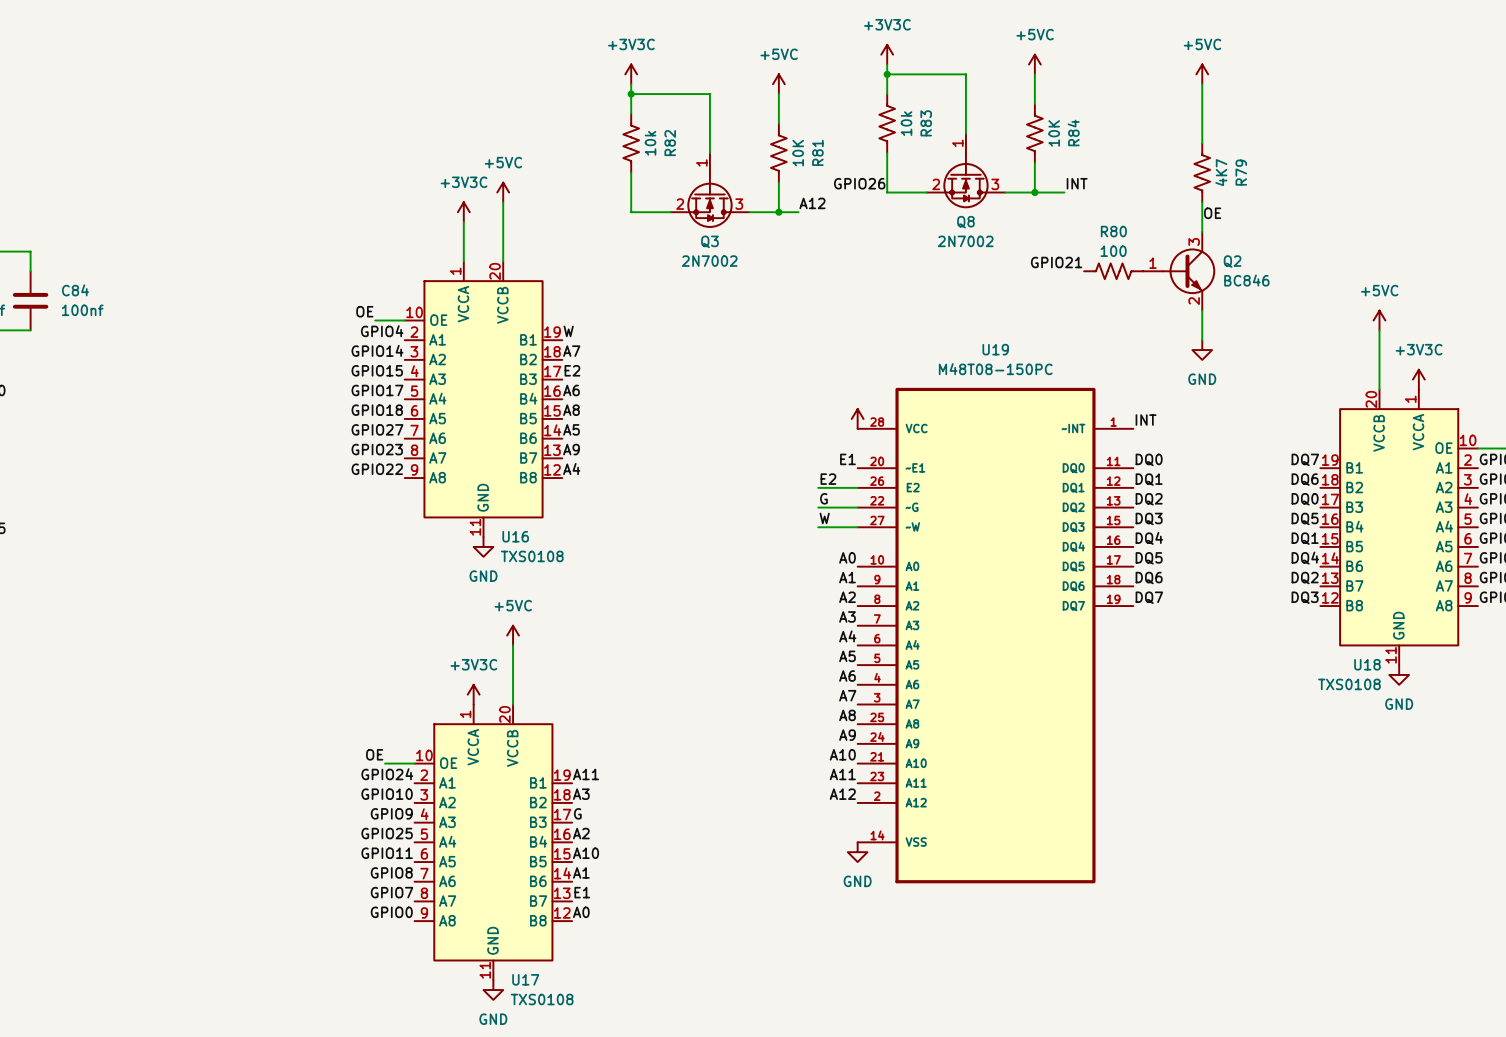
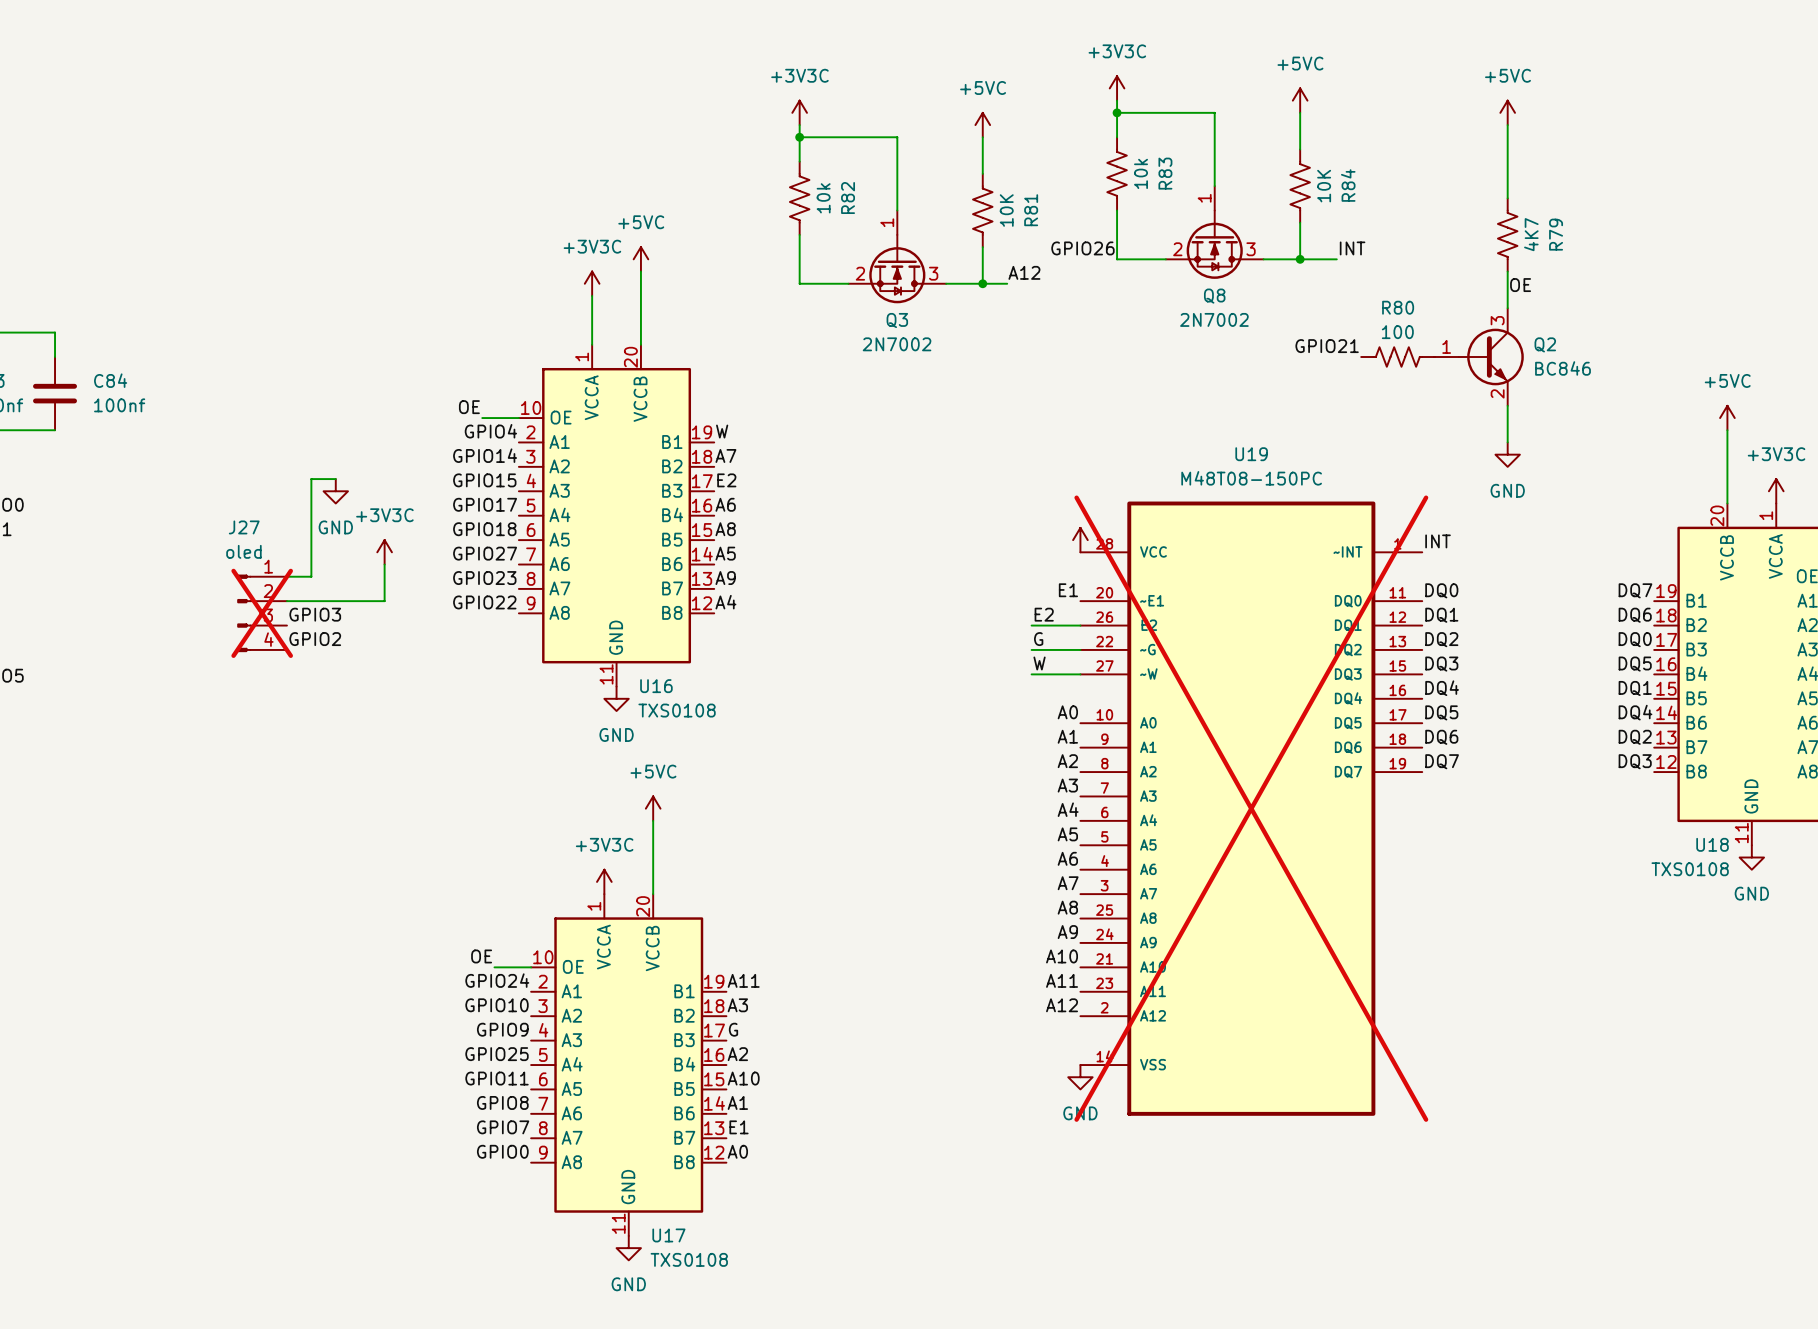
wire: none -> (335, 479) (311, 479) (311, 576) (286, 576)
power symbol: none -> GND (335, 491)
power symbol: none -> +3V3C (384, 552)
wire: none -> (384, 564) (384, 601) (286, 601)
J27: none -> oled (262, 613)
label: none -> GPIO3 (315, 614)
label: none -> GPIO2 (315, 639)
U19 do-not-place cross: none -> (1251, 808)

